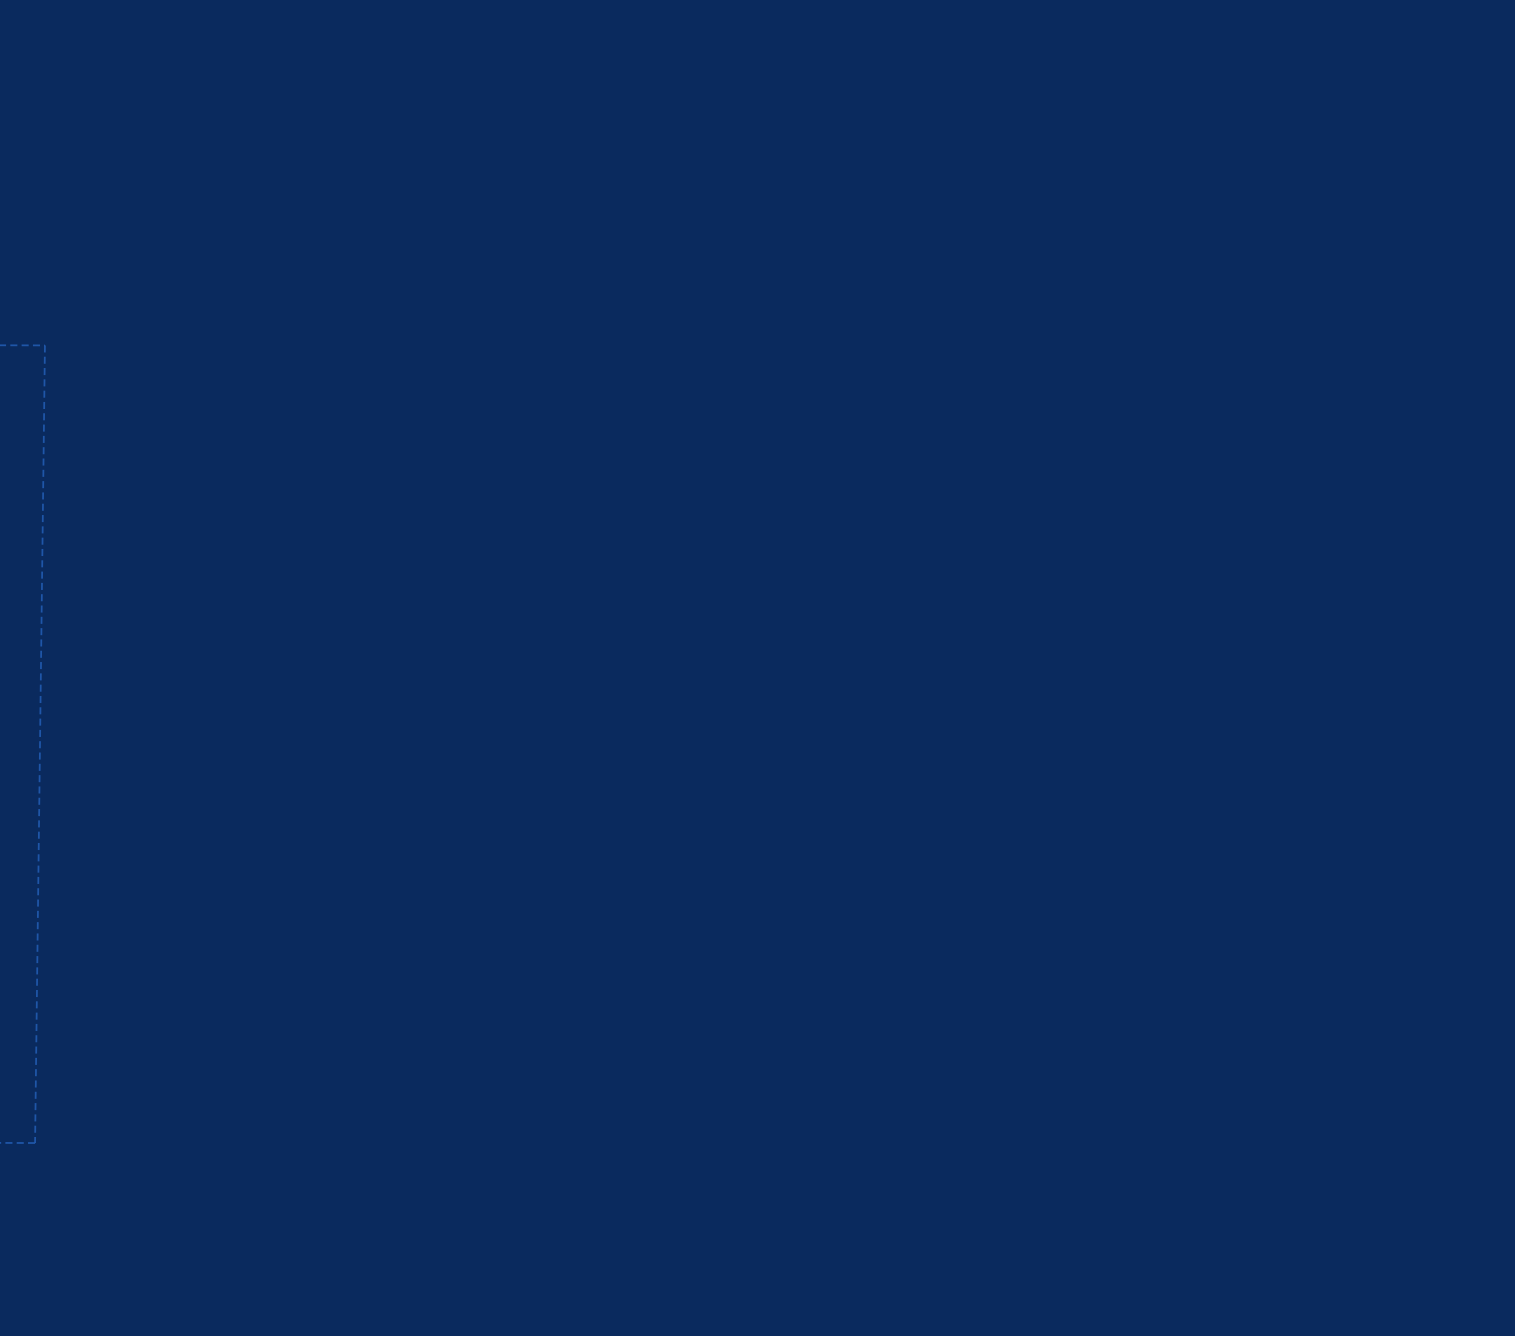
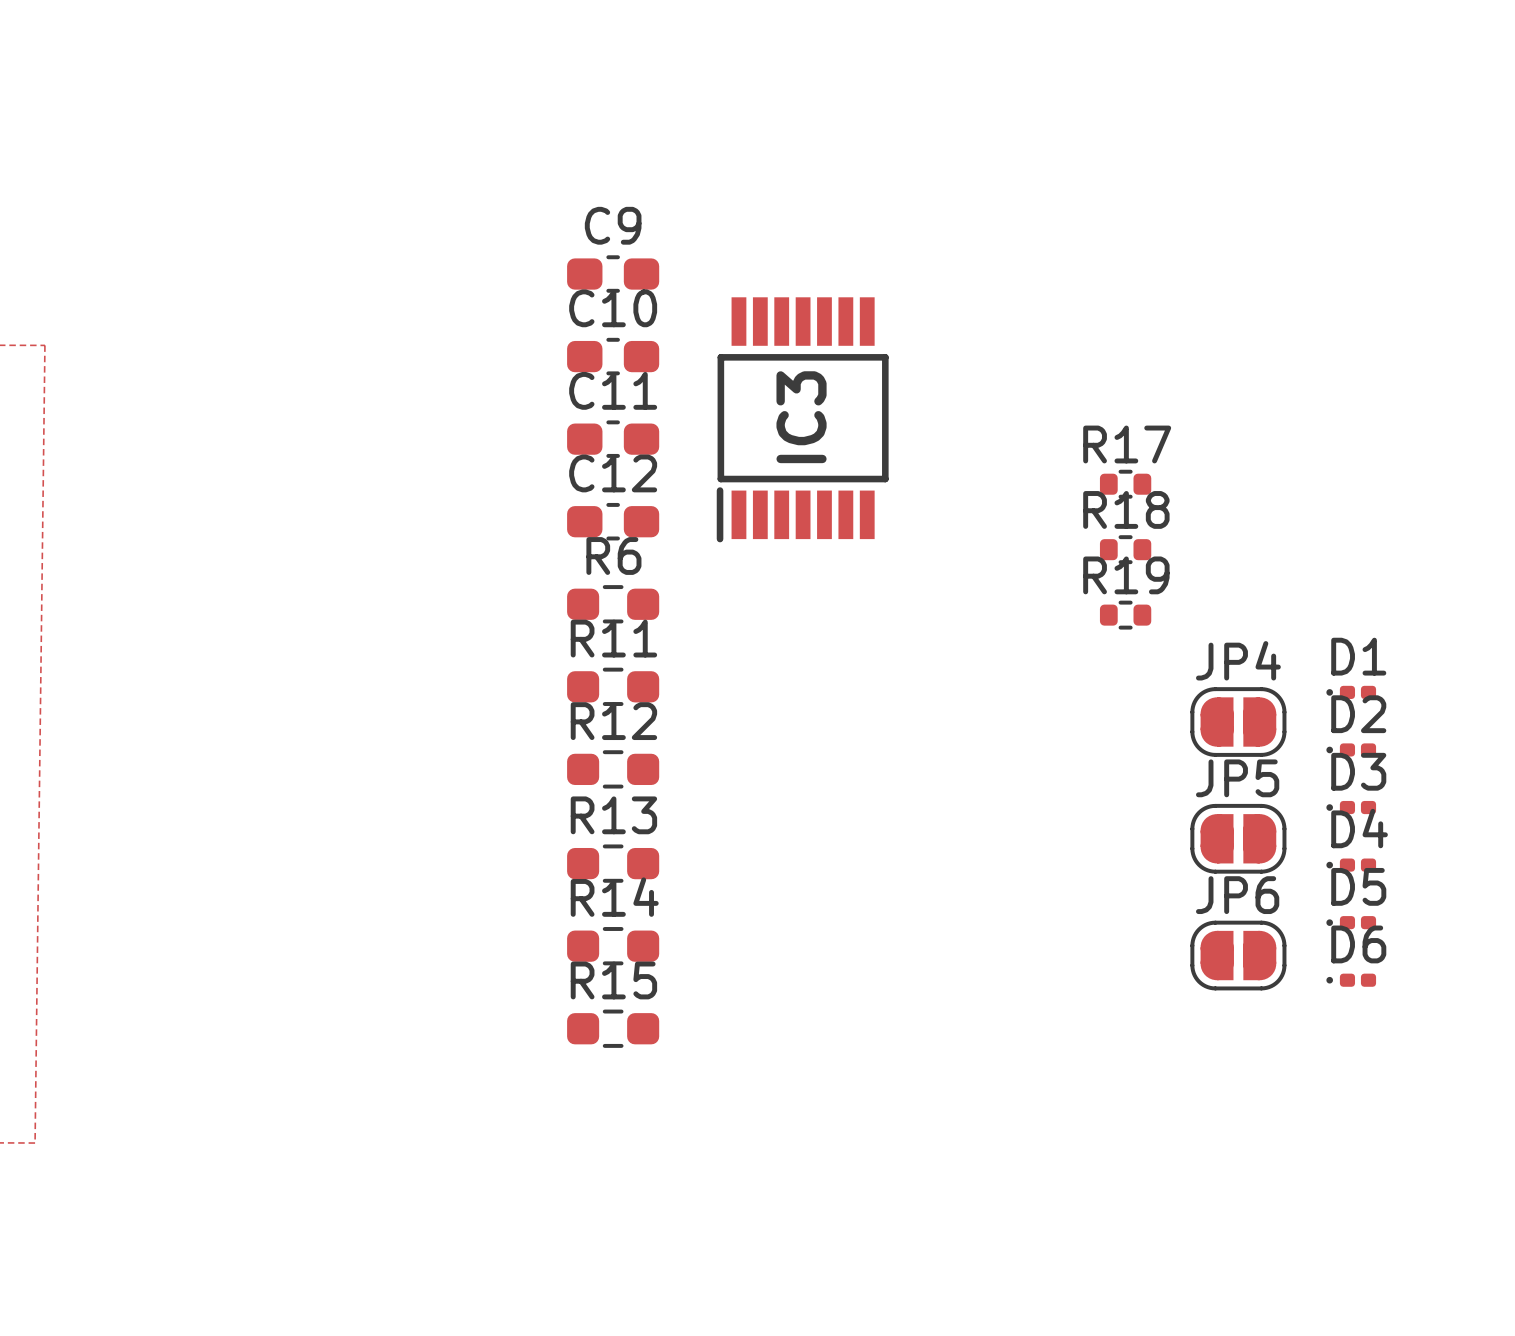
C9: none -> (613, 274)
C10: none -> (613, 356)
IC3: none -> (802, 419)
C11: none -> (613, 439)
R17: none -> (1125, 484)
C12: none -> (613, 521)
R18: none -> (1125, 549)
R6: none -> (613, 604)
R19: none -> (1125, 615)
R11: none -> (613, 686)
D1: none -> (1351, 692)
JP4: none -> (1238, 722)
D2: none -> (1351, 749)
R12: none -> (613, 769)
D3: none -> (1351, 807)
JP5: none -> (1238, 838)
R13: none -> (613, 863)
D4: none -> (1351, 865)
D5: none -> (1351, 922)
R14: none -> (613, 946)
JP6: none -> (1238, 955)
D6: none -> (1351, 980)
R15: none -> (613, 1028)

